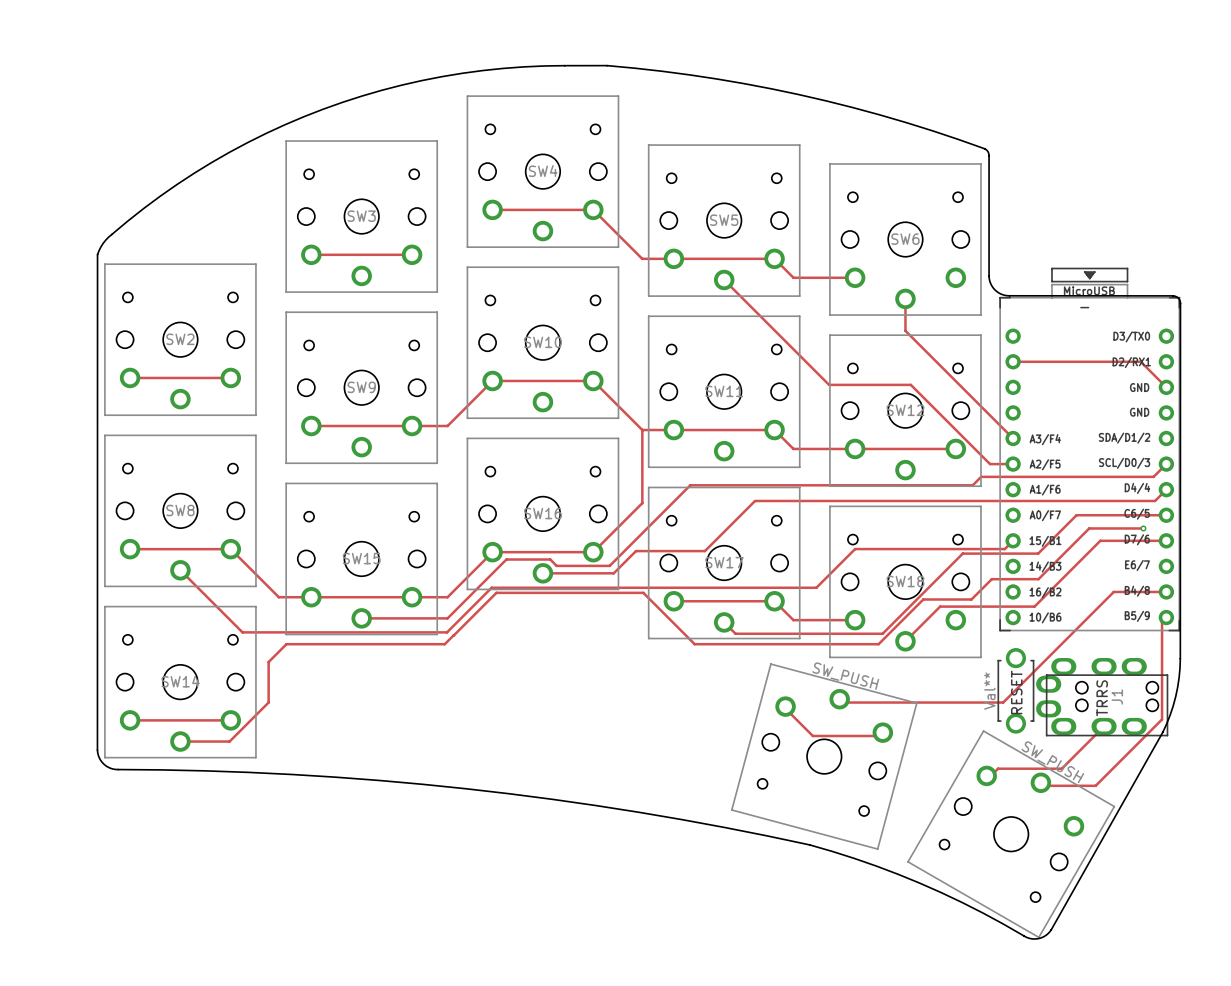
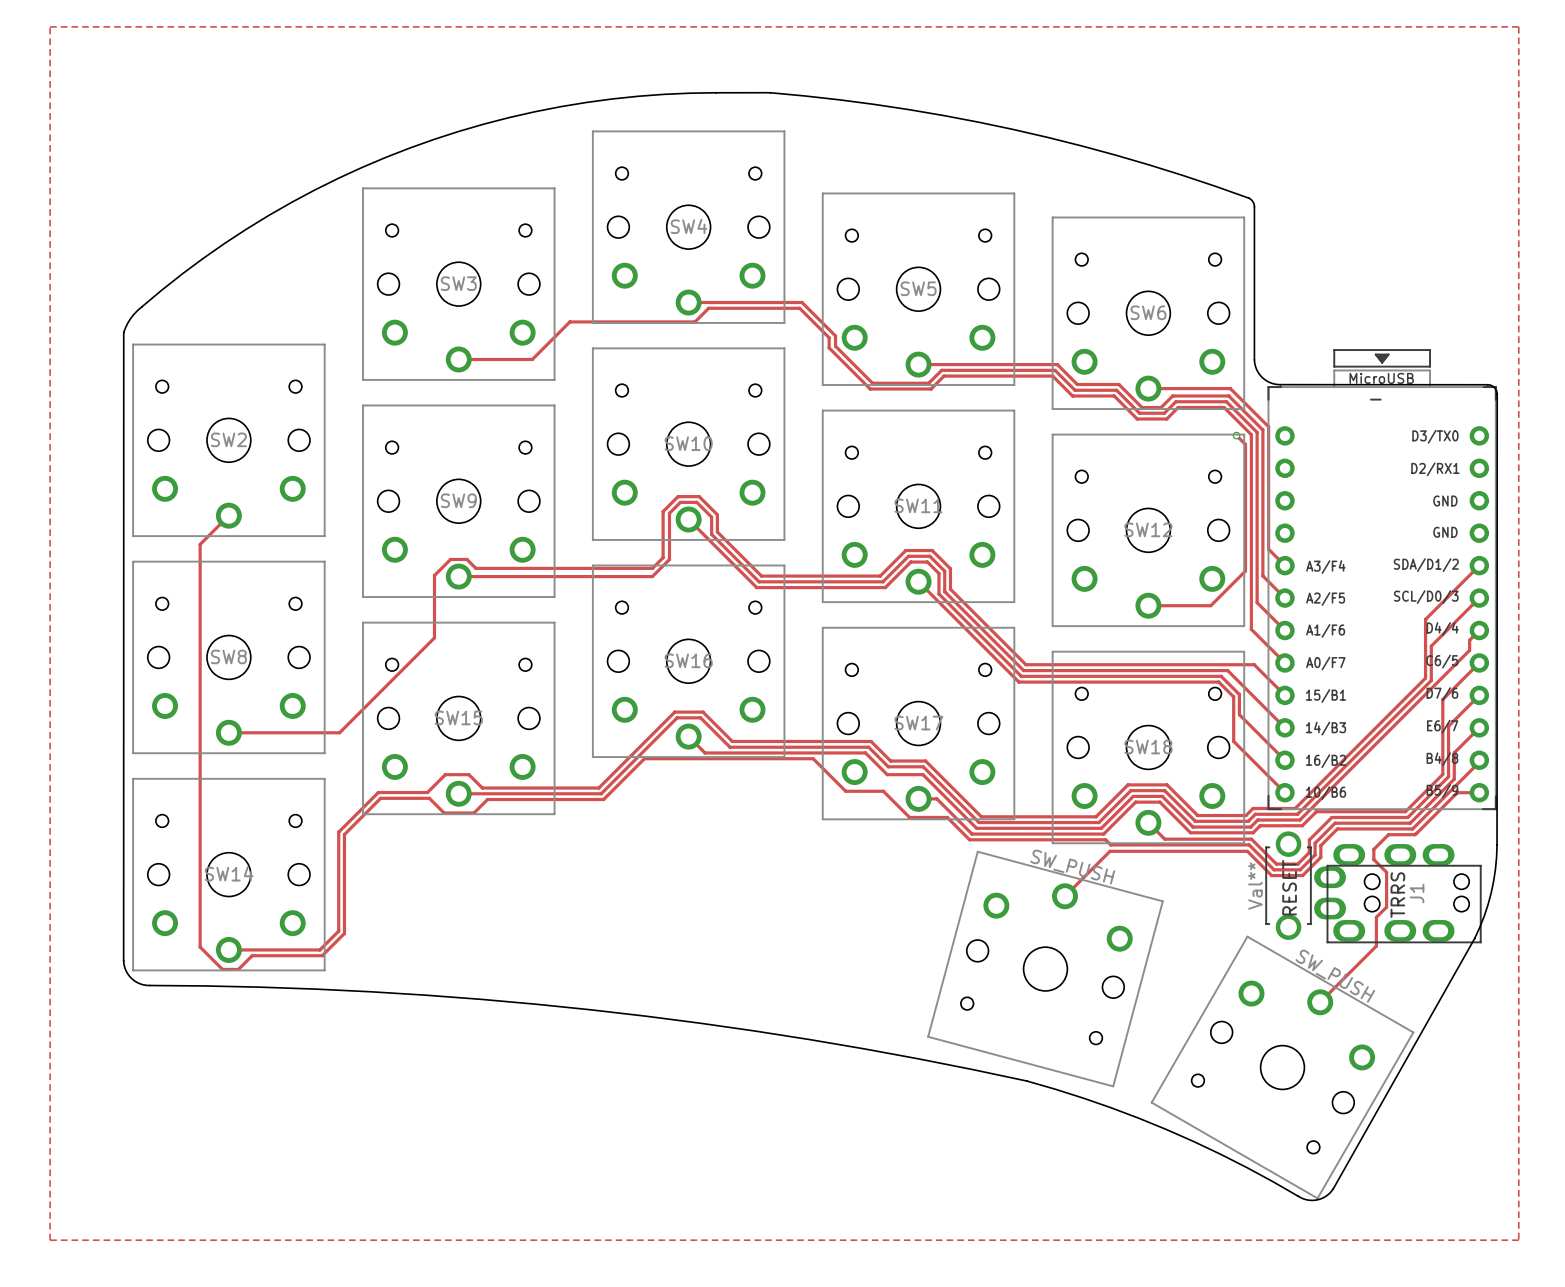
zone outline: none -> (50, 26) (50, 1240) (1518, 1240) (1518, 26) (50, 26)
track: (492, 209) (593, 209) (642, 258) (774, 258) (793, 277) (855, 277) -> none
track: none -> (688, 302) (802, 302) (835, 335) (835, 346) (872, 383) (928, 383) (941, 370) (1055, 370) (1074, 390) (1116, 390) (1139, 413) (1164, 413) (1175, 401) (1226, 401) (1257, 432) (1257, 602) (1284, 630)
track: (311, 254) (412, 254) -> none
track: none -> (458, 359) (532, 359) (569, 321) (695, 321) (708, 308) (799, 308) (829, 337) (829, 347) (870, 388) (931, 388) (944, 376) (1052, 376) (1072, 396) (1114, 396) (1137, 418) (1166, 418) (1178, 407) (1224, 407) (1251, 434) (1251, 629) (1284, 662)
track: (724, 279) (829, 384) (910, 384) (990, 464) (1013, 464) -> (918, 364) (1057, 364) (1077, 384) (1118, 384) (1141, 407) (1161, 407) (1172, 396) (1228, 396) (1262, 429) (1262, 575) (1284, 598)
track: (905, 298) (905, 330) (1000, 425) -> (1148, 388) (1230, 388) (1268, 426) (1268, 549)
track: none -> (1236, 435) (1245, 444) (1245, 571) (1210, 605) (1148, 605)
via: none -> (1236, 435)
track: (1013, 361) (1140, 361) (1166, 387) -> none
track: (130, 377) (230, 377) -> none
track: none -> (228, 515) (200, 544) (200, 947) (222, 969) (238, 969) (252, 955) (322, 955) (344, 933) (344, 834) (380, 798) (429, 798) (444, 812) (474, 812) (487, 799) (603, 799) (644, 758) (813, 758) (845, 791) (883, 791) (909, 817) (947, 817) (969, 839) (1105, 839) (1110, 844) (1249, 844) (1274, 869) (1300, 869) (1315, 854) (1315, 843) (1335, 823) (1410, 823) (1454, 779) (1454, 752) (1479, 727)
track: none -> (688, 519) (756, 587) (885, 587) (910, 562) (927, 562) (938, 573) (938, 594) (1021, 676) (1221, 676) (1239, 694) (1239, 714) (1284, 760)
track: (311, 426) (447, 426) (492, 380) (593, 380) (642, 430) -> none
track: (642, 430) (642, 503) (593, 552) (492, 552) (447, 597) (278, 597) (230, 549) (130, 549) -> none
track: (642, 430) (774, 430) (793, 448) (955, 448) -> none
track: none -> (458, 576) (652, 576) (669, 559) (669, 513) (680, 502) (696, 502) (711, 517) (711, 534) (759, 581) (882, 581) (908, 556) (929, 556) (944, 571) (944, 591) (1023, 670) (1227, 670) (1284, 727)
track: none -> (918, 581) (1018, 682) (1218, 682) (1233, 696) (1233, 741) (1284, 792)
track: (1153, 476) (981, 476) (972, 485) (690, 485) (609, 565) (556, 565) (550, 559) (506, 559) (447, 618) -> (1463, 614) (1431, 646) (1431, 680) (1297, 814) (1255, 814) (1248, 821) (1195, 821) (1164, 790) (1130, 790) (1098, 822) (979, 822) (923, 766) (888, 766) (868, 747) (729, 747) (700, 717) (677, 717) (601, 793) (567, 793)
track: (1158, 497) (1155, 501) (755, 501) (704, 551) (635, 551) (613, 573) (542, 573) -> (1469, 640) (1469, 650) (1299, 820) (1257, 820) (1250, 827) (1192, 827) (1162, 796) (1133, 796) (1101, 828) (976, 828) (923, 774) (887, 774) (865, 752) (705, 752) (688, 736)
track: (1166, 515) (1076, 515) (1038, 553) (962, 553) (882, 633) (735, 633) (724, 622) -> (1479, 662) (1442, 699) (1442, 774) (1405, 811) (1316, 811) (1302, 825) (1260, 825) (1253, 832) (1190, 832) (1159, 802) (1135, 802) (1103, 834) (972, 834) (936, 798) (918, 798)
track: (1143, 528) (1089, 528) (1038, 579) (991, 579) (971, 599) (923, 599) (878, 644) (694, 644) (643, 592) (496, 592) (444, 644) (286, 644) (268, 662) (268, 702) (229, 741) -> (1479, 565) (1425, 619) (1425, 678) (1295, 808) (1253, 808) (1246, 815) (1197, 815) (1167, 784) (1127, 784) (1096, 816) (981, 816) (925, 761) (890, 761) (871, 741) (732, 741) (702, 712) (674, 712) (598, 788) (482, 788) (468, 774) (445, 774) (427, 792) (378, 792) (338, 832) (338, 931) (319, 949) (291, 949)
via: (1143, 528) -> none
track: (1013, 540) (1004, 549) (855, 549) (816, 587) (491, 587) (447, 632) (242, 632) (180, 570) -> (1284, 695) (1254, 664) (1025, 664) (950, 589) (950, 568) (932, 550) (905, 550) (880, 576) (761, 576) (717, 531) (717, 514) (699, 496) (678, 496) (663, 511) (663, 557) (652, 568) (475, 568) (466, 559) (450, 559) (434, 575) (434, 637) (339, 732) (228, 732)
track: (1166, 540) (1100, 540) (1034, 606) (940, 606) (905, 641) -> (1479, 695) (1448, 726) (1448, 776) (1407, 817) (1331, 817) (1309, 839) (1309, 852) (1297, 864) (1276, 864) (1251, 839) (1164, 839) (1148, 822)
track: (1166, 591) (1113, 591) (1003, 702) (840, 702) -> (1479, 760) (1412, 828) (1337, 828) (1320, 845) (1320, 857) (1302, 875) (1271, 875) (1247, 851) (1109, 851) (1064, 896)
track: (673, 601) (774, 601) (793, 620) (855, 620) -> none
track: (1166, 617) (1162, 621) (1162, 719) (1095, 785) (1042, 785) -> (1479, 792) (1457, 792) (1415, 834) (1388, 834) (1373, 849) (1373, 859) (1386, 872) (1386, 907) (1376, 917) (1376, 946) (1320, 1002)
track: (786, 709) (812, 735) (884, 735) -> none
track: (130, 720) (230, 720) -> none
track: (1104, 726) (1061, 768) (998, 768) (987, 778) -> none

